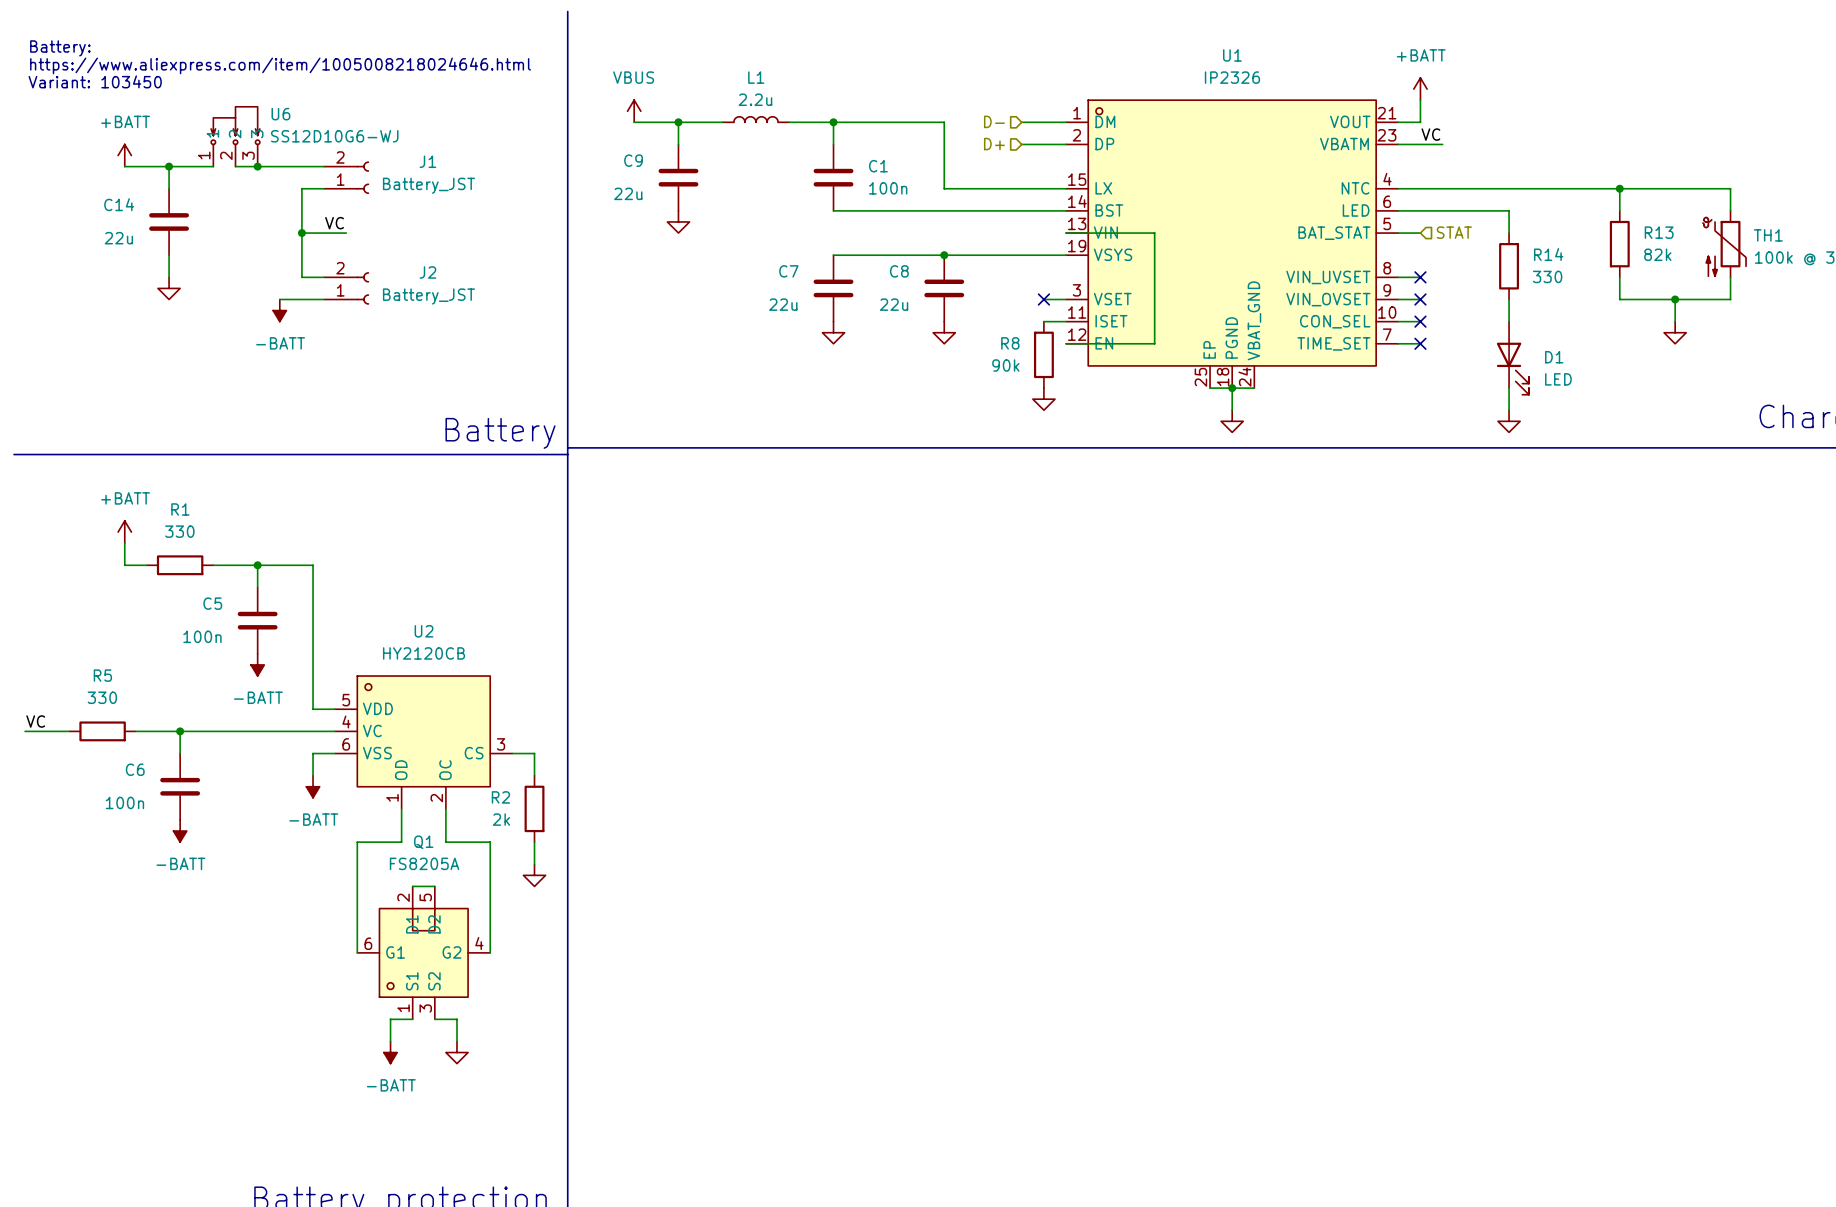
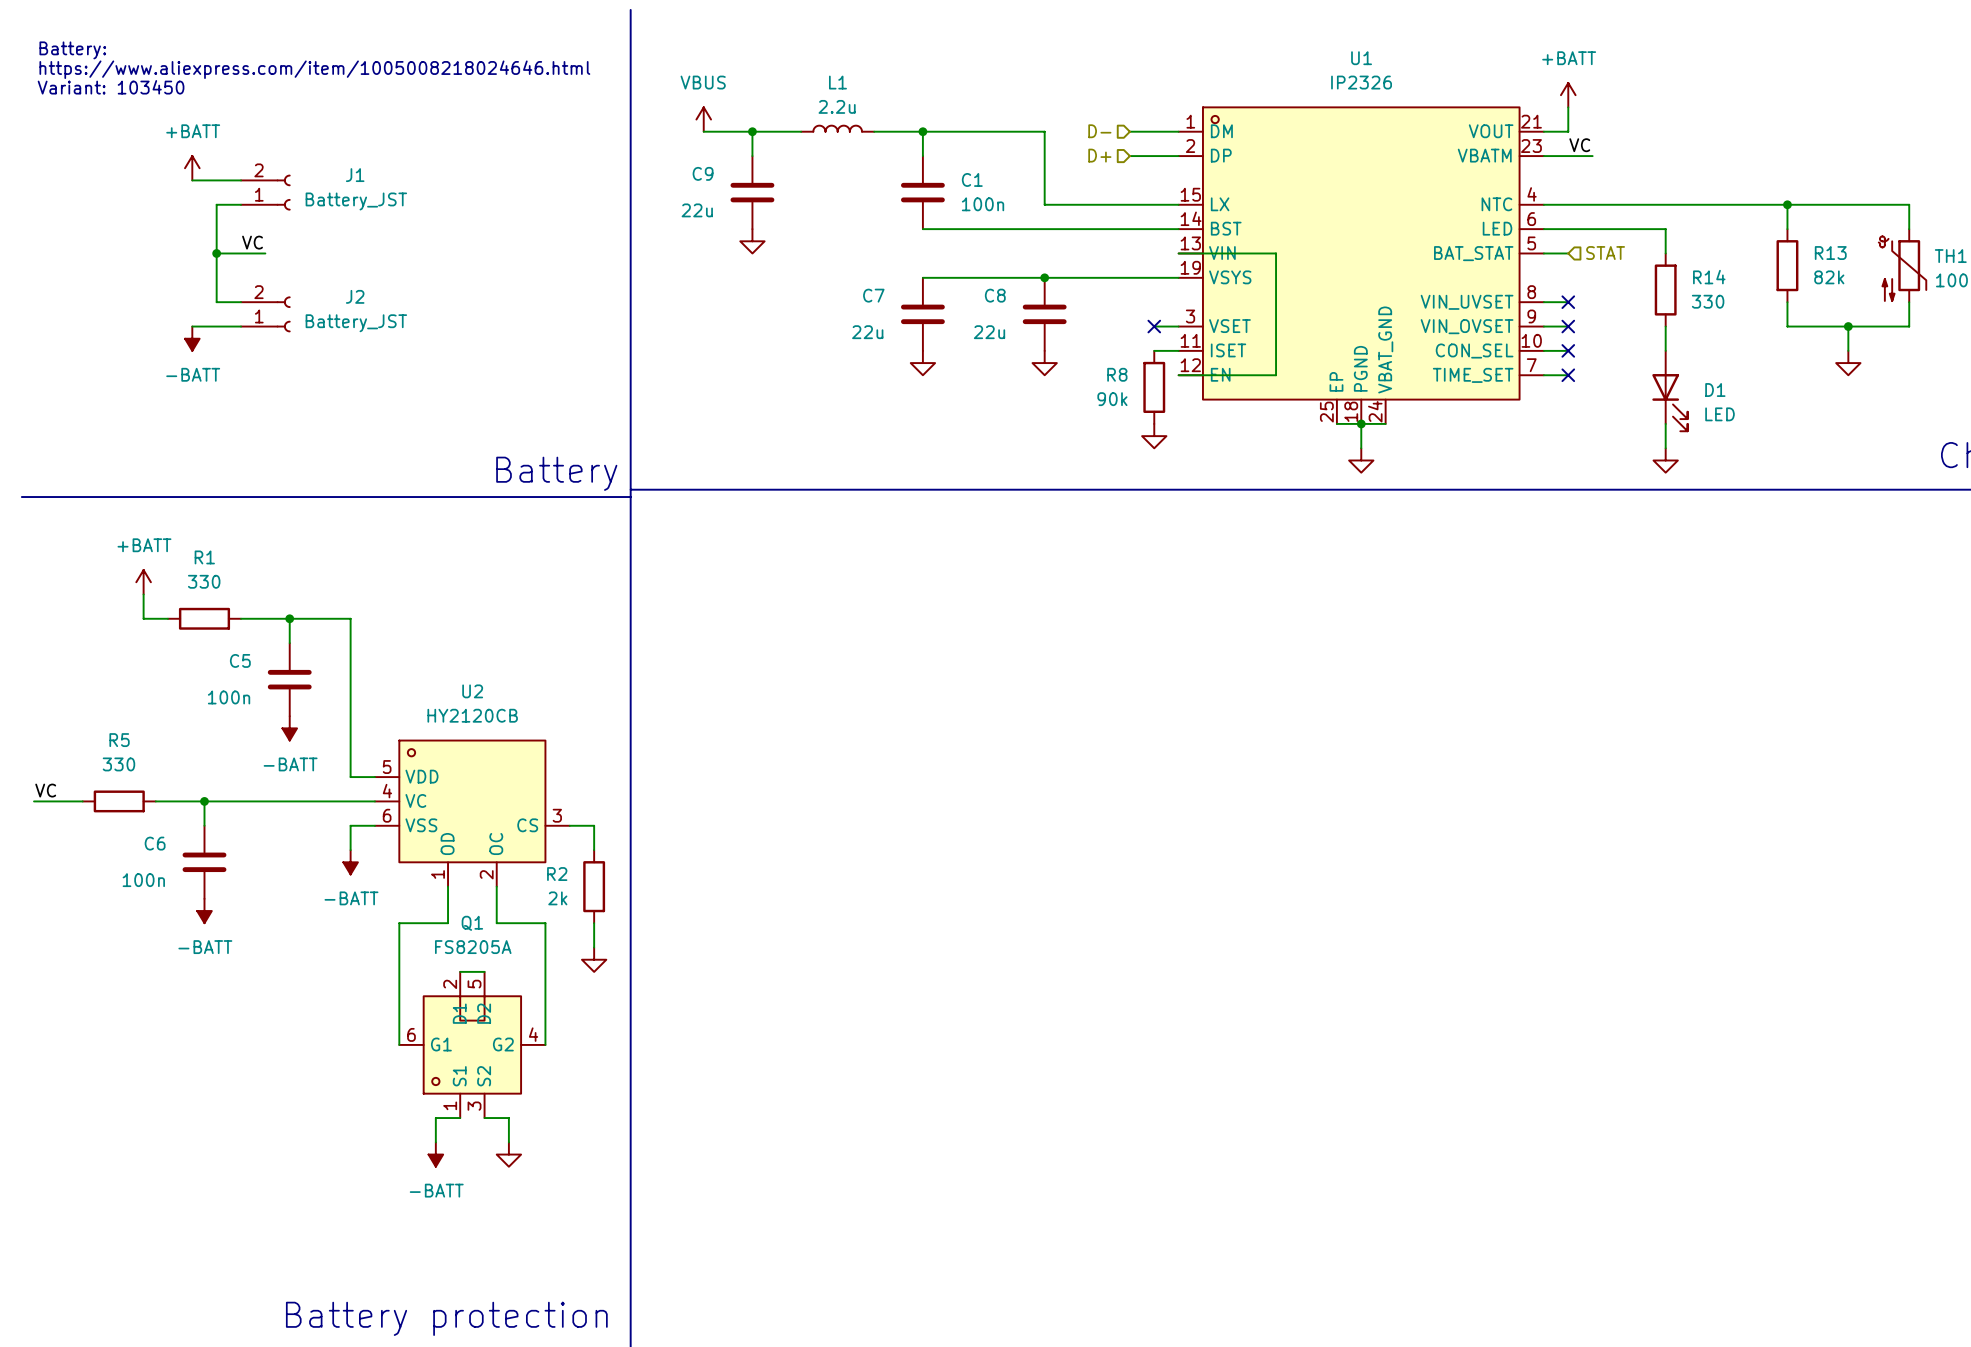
U6: SS12D10G6-WJ (235, 136) -> none
power symbol position: +BATT (124, 155) -> +BATT (192, 168)
wire: (124, 166) (169, 166) (169, 188) -> none
junction: (169, 166) -> none
wire: (235, 166) (324, 166) -> none
junction: (257, 166) -> none
J1 position: (346, 177) -> (265, 192)
wire: (324, 188) (301, 188) (301, 277) (324, 277) -> (241, 204) (216, 204) (216, 302) (241, 302)
C14: 22u (169, 221) -> none
label position: VC (334, 223) -> VC (252, 242)
junction: none -> (216, 253)
wire: (301, 233) (346, 233) -> (216, 253) (265, 253)
junction: (301, 233) -> none
wire: (169, 255) (169, 277) -> none
power symbol: (169, 288) -> none
J2 position: (346, 288) -> (265, 314)
wire: (279, 299) (324, 299) -> (192, 326) (241, 326)
power symbol position: -BATT (279, 310) -> -BATT (192, 338)

